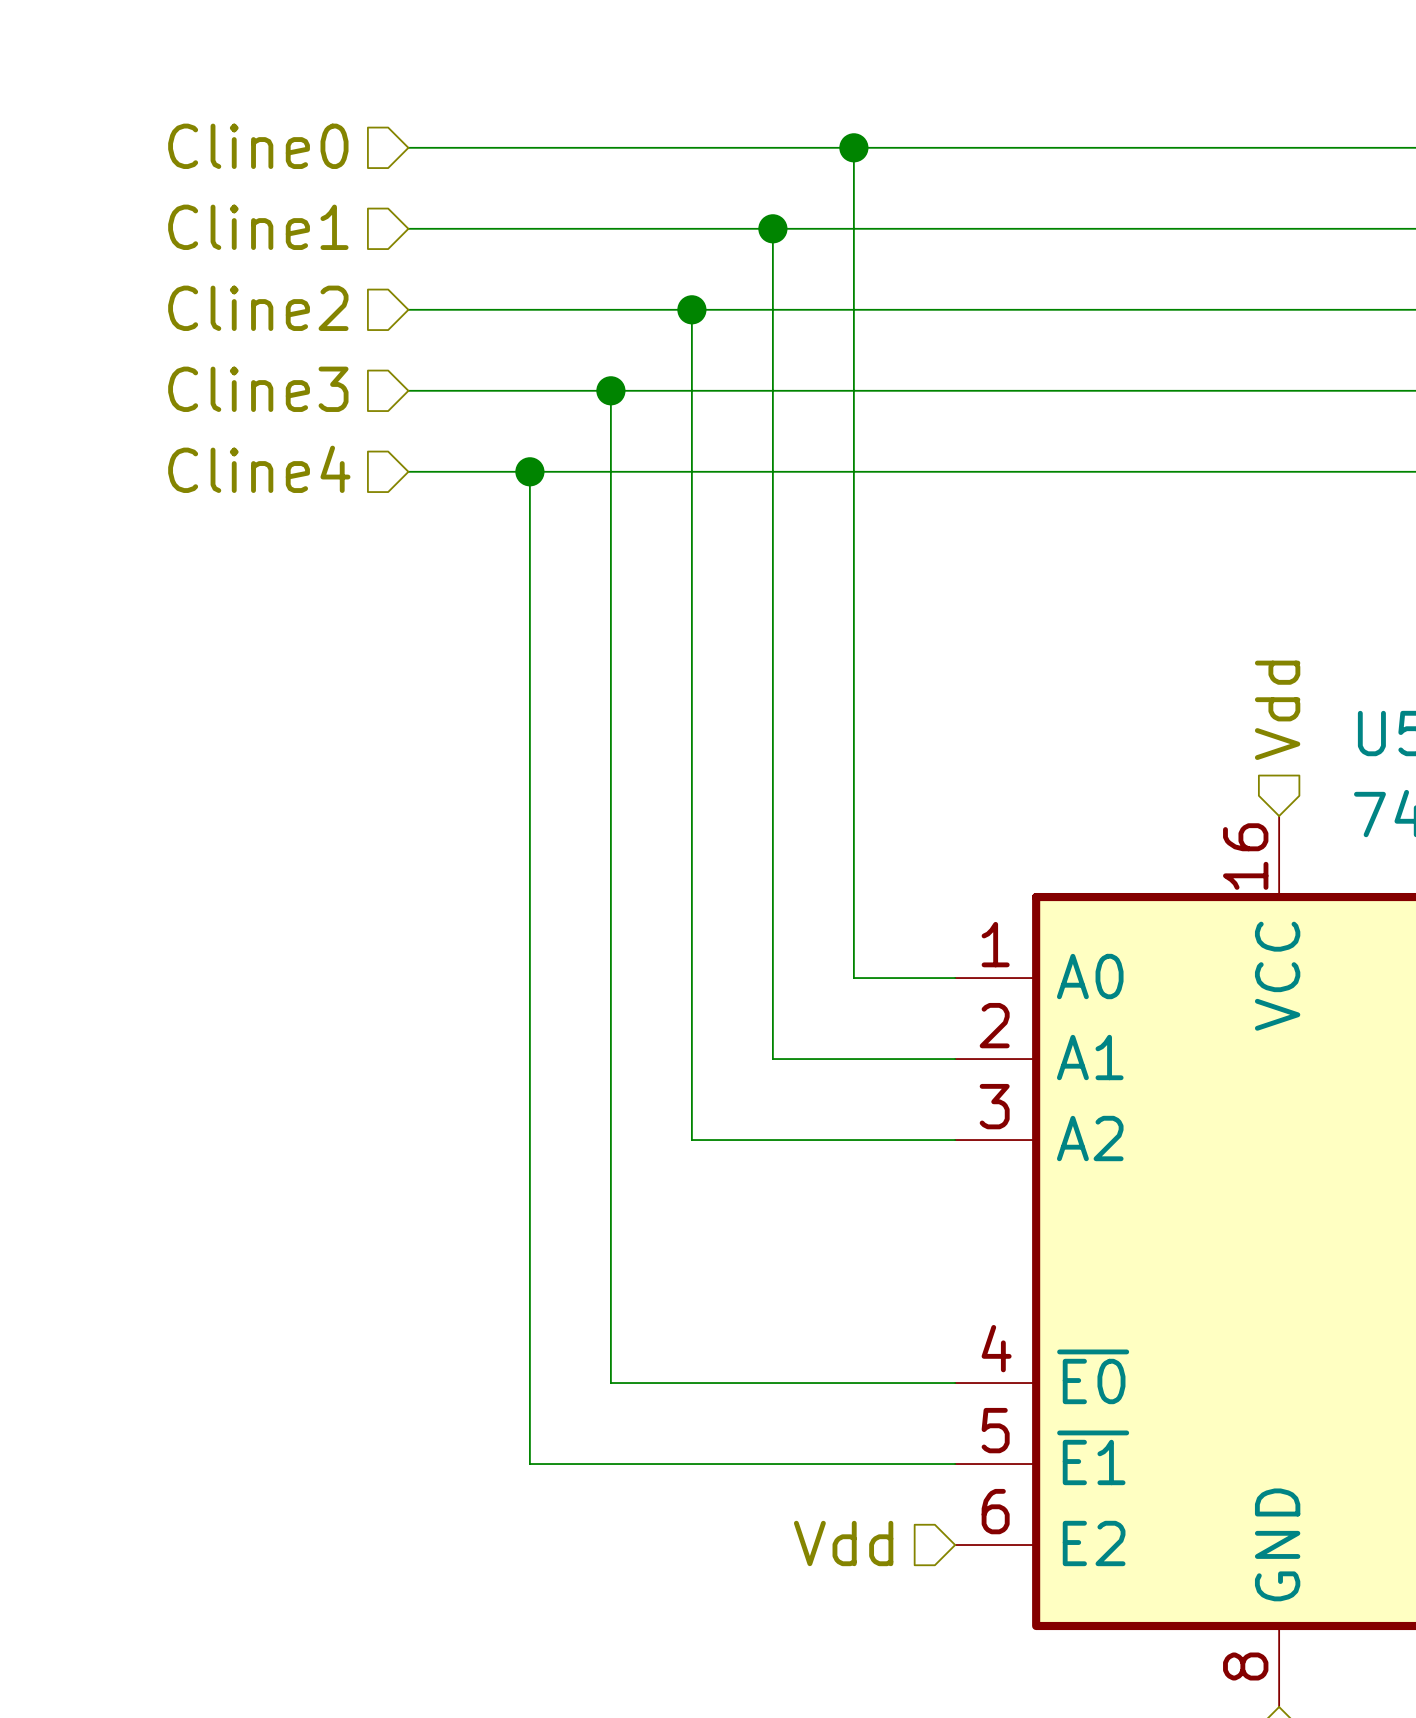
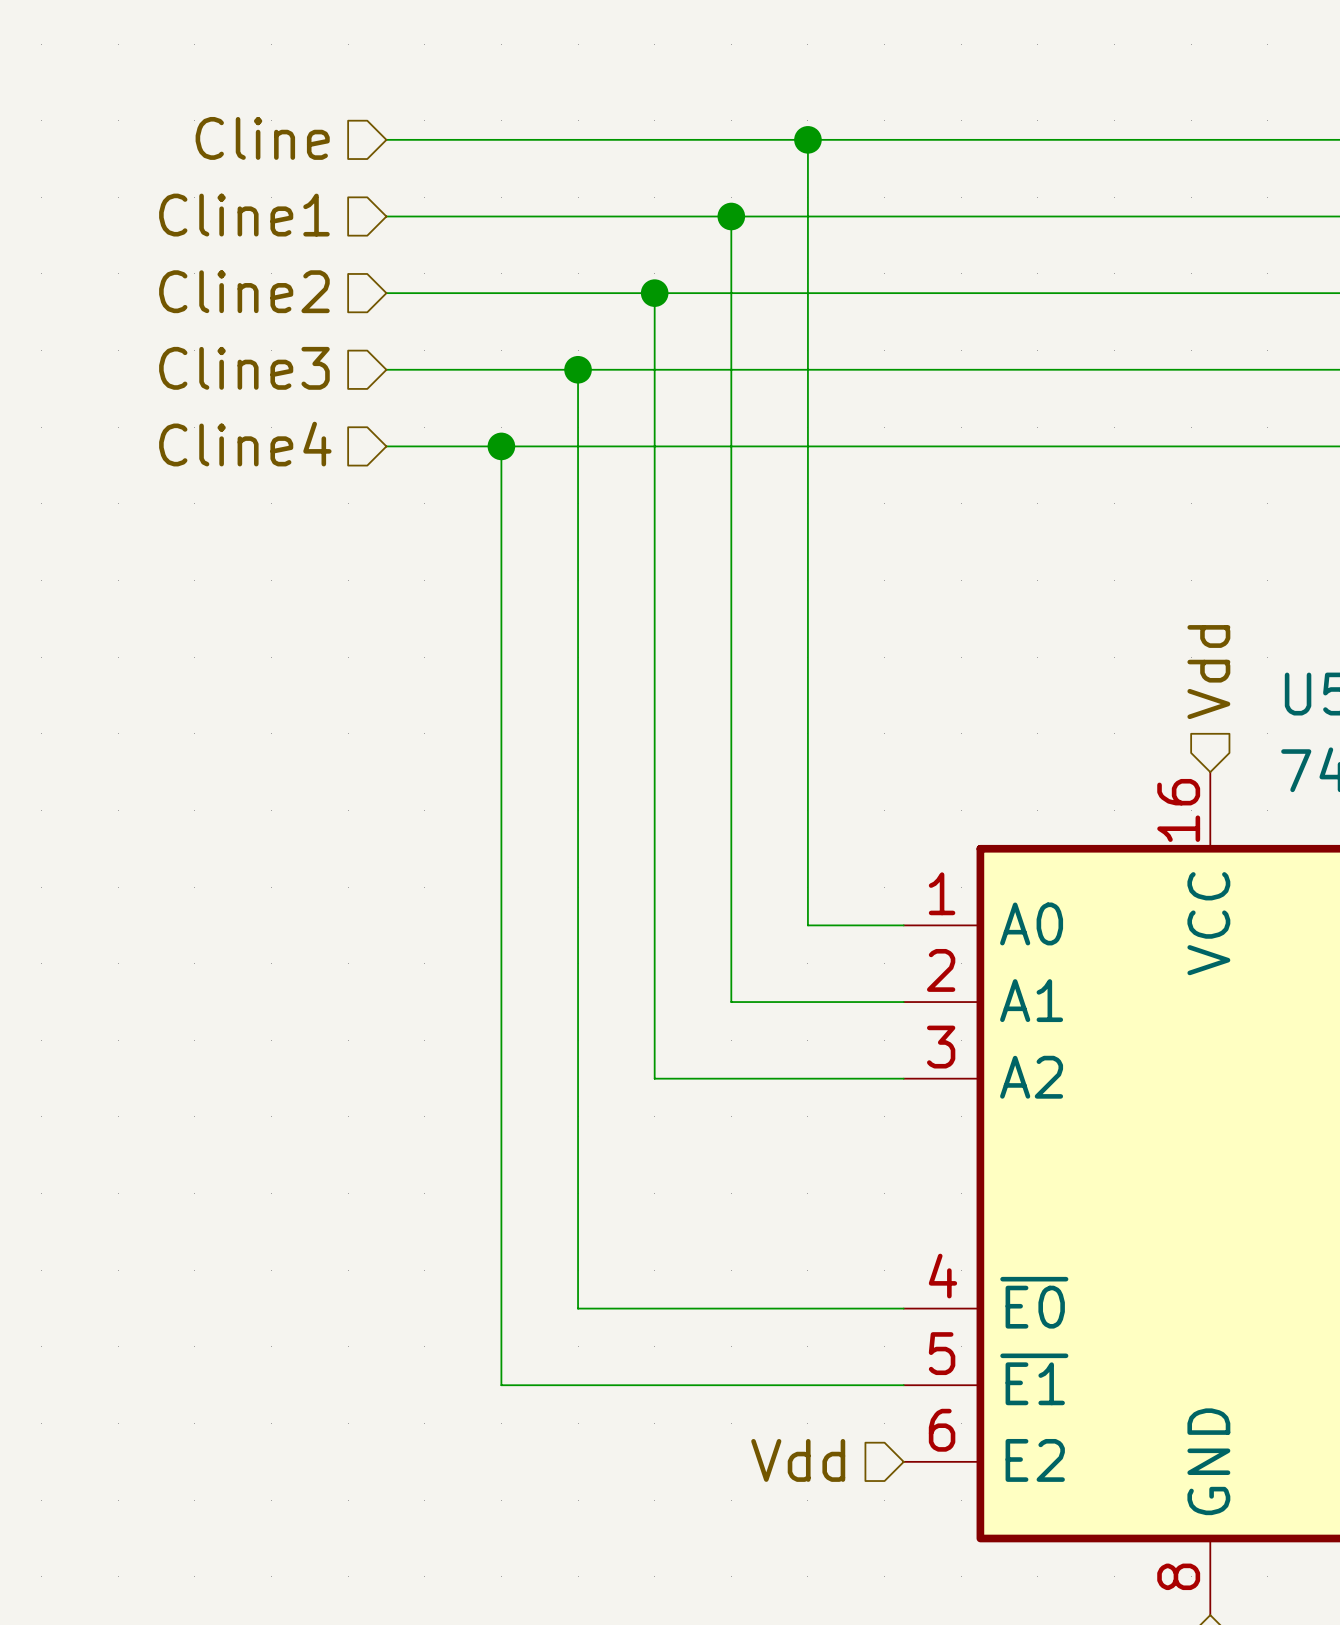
hierarchical label: Cline0 (258, 146) -> Cline (262, 138)

